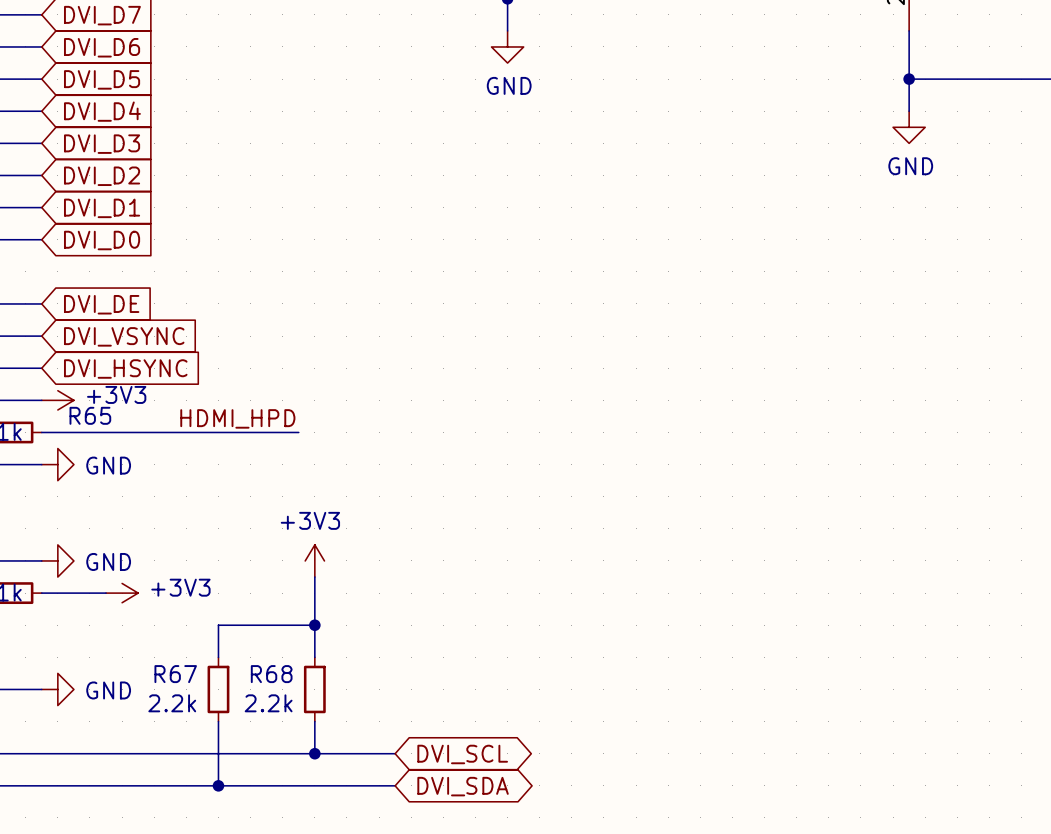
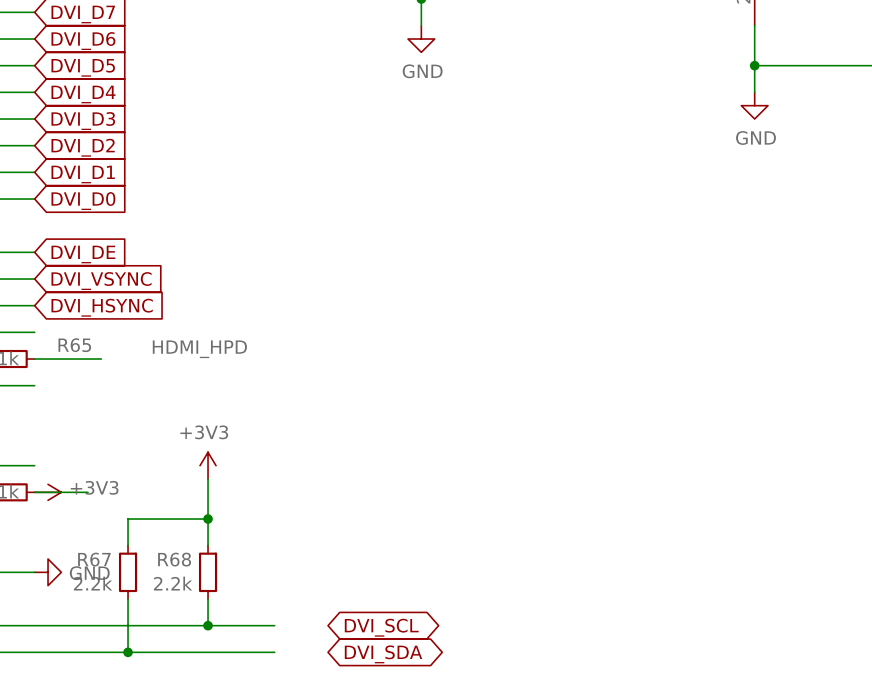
power symbol: +3V3 (57, 400) -> none
wire: (122, 432) (298, 432) -> none
power symbol: GND (57, 464) -> none
power symbol: GND (57, 560) -> none
power symbol position: +3V3 (314, 560) -> +3V3 (208, 465)
wire: (314, 577) (314, 657) -> (208, 479) (208, 545)
power symbol position: +3V3 (122, 593) -> +3V3 (48, 492)
wire: (218, 625) (218, 657) -> (181, 519) (128, 519) (128, 545)
wire: (250, 625) (314, 625) -> none
junction position: (314, 625) -> (208, 519)
R67 position: (218, 689) -> (128, 572)
R68 position: (314, 689) -> (208, 572)
wire: (218, 721) (218, 785) -> (128, 599) (128, 652)
wire: (314, 721) (314, 753) -> (208, 599) (208, 625)
junction: none -> (208, 625)
junction: (314, 753) -> none
wire: (330, 753) (395, 753) -> none
junction: none -> (128, 652)
junction: (218, 785) -> none
wire: (330, 785) (395, 785) -> none

